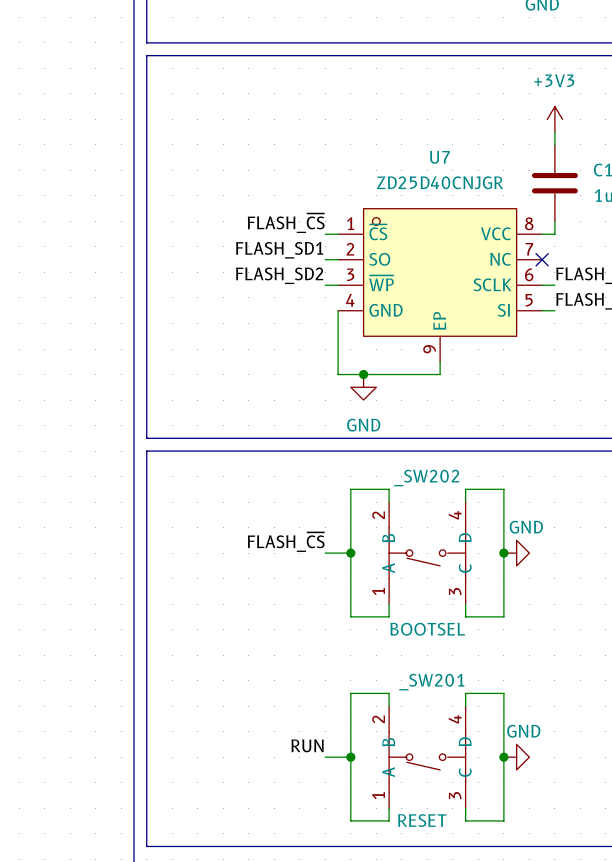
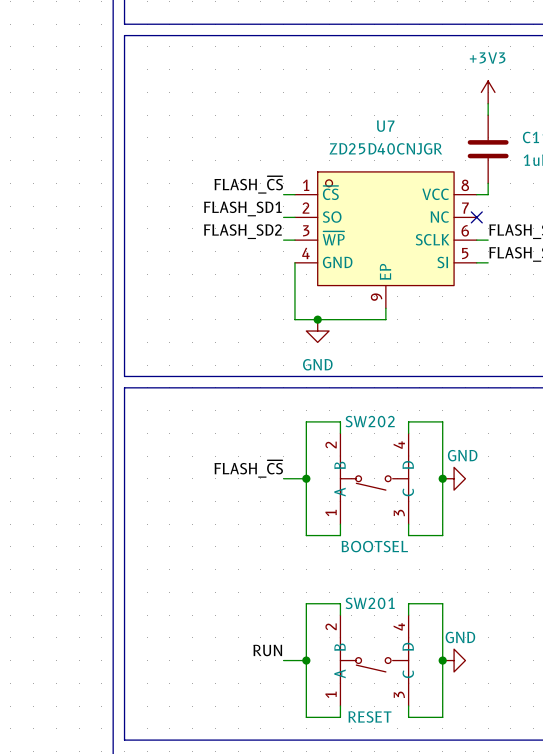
_SW202 name: _SW202 (426, 478) -> SW202 (370, 421)
_SW201 name: _SW201 (431, 682) -> SW201 (370, 603)

